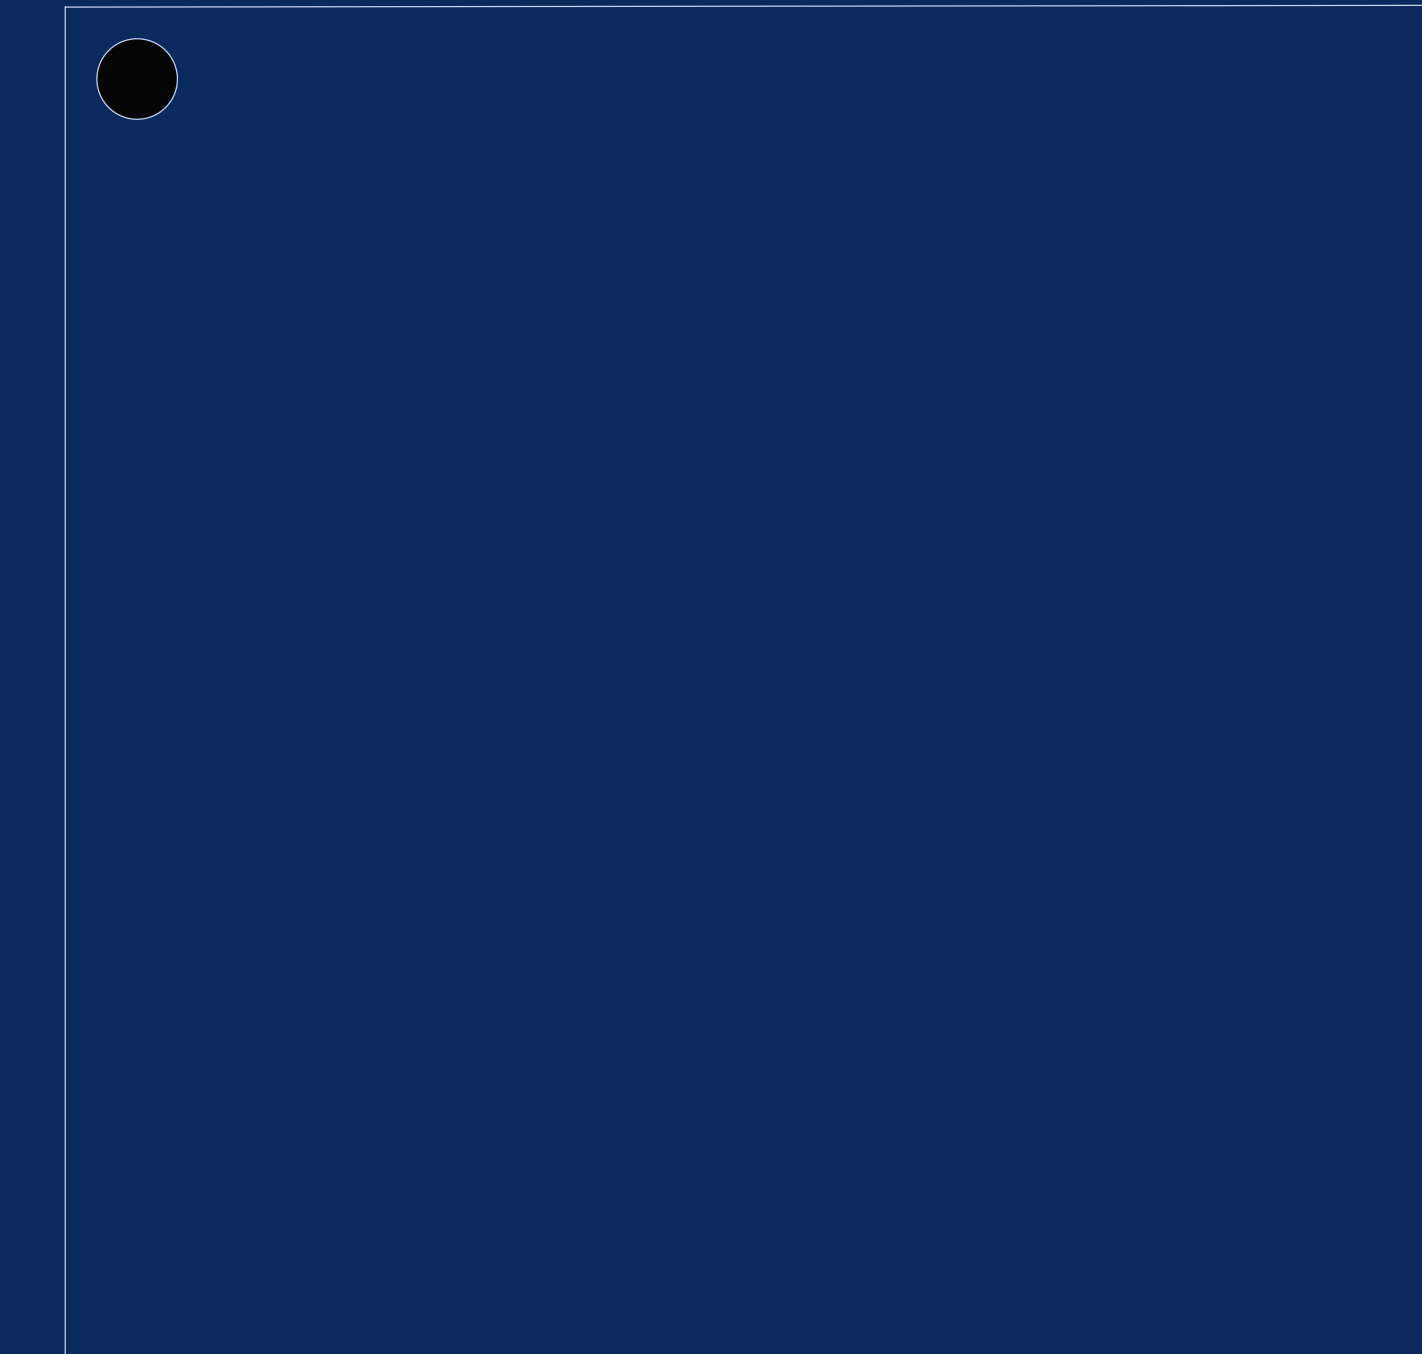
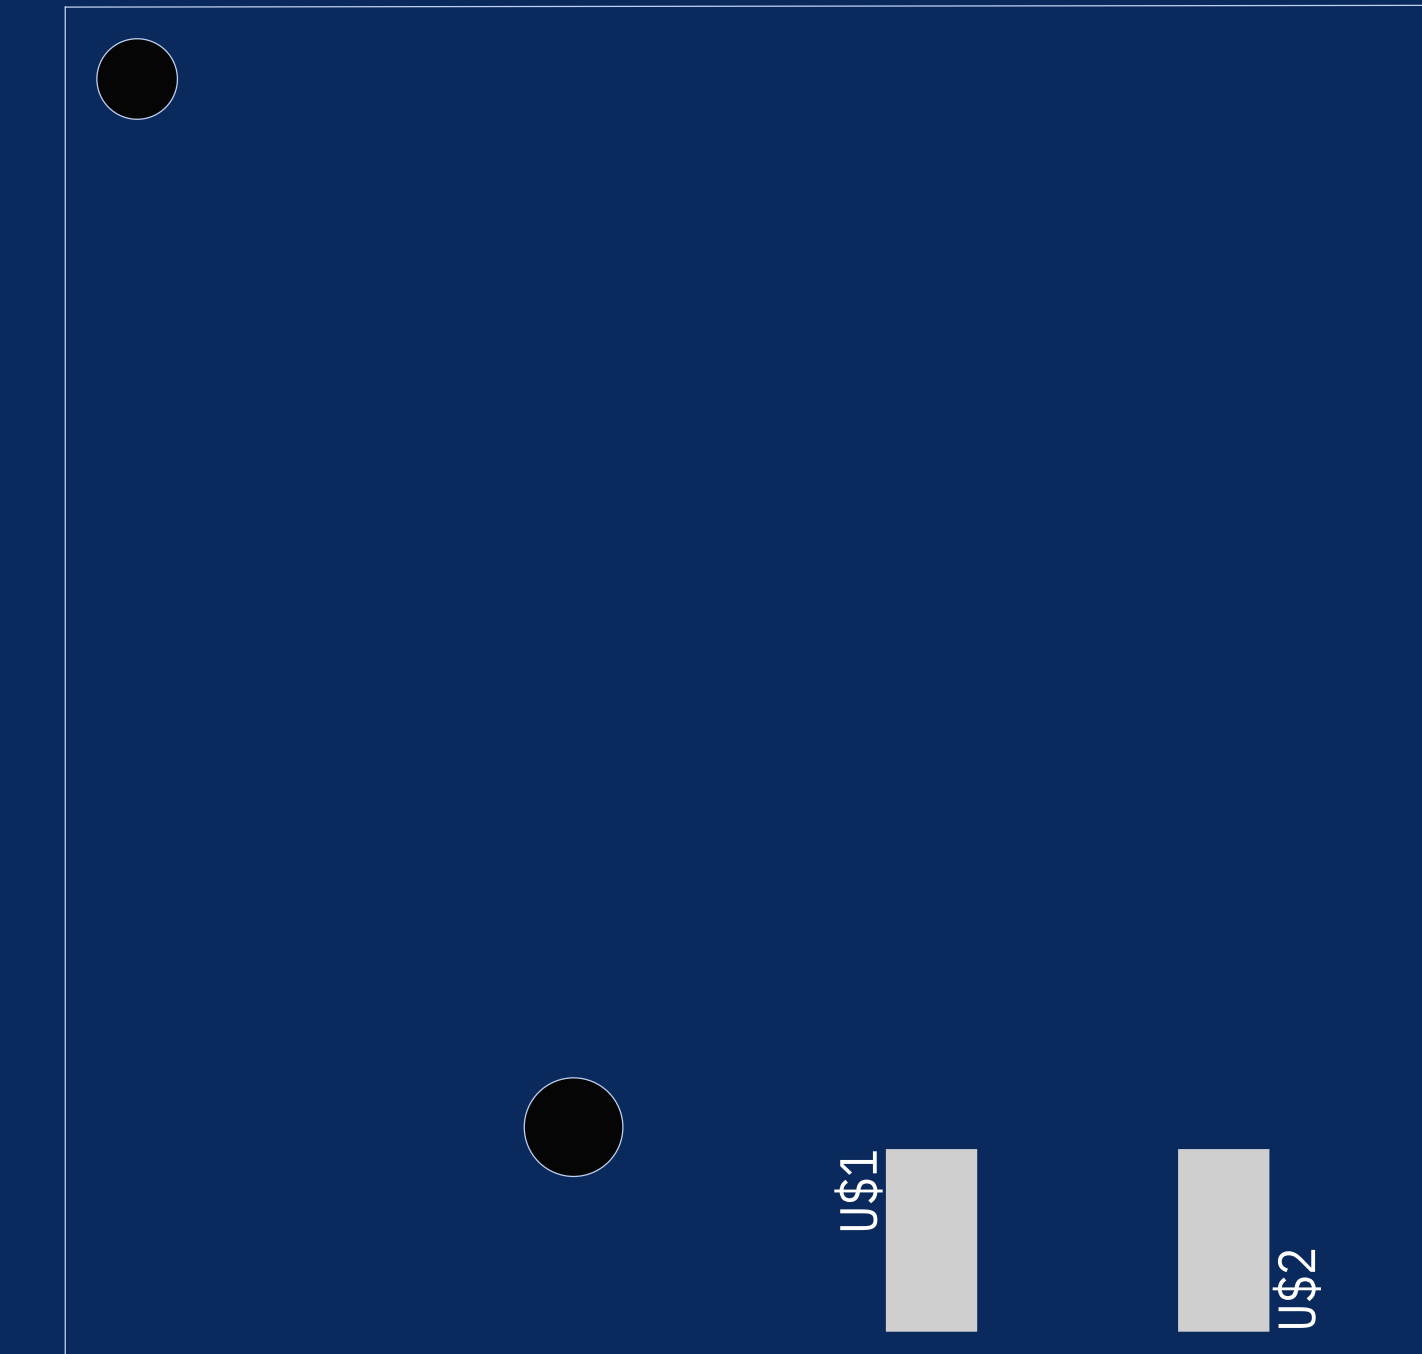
hole: none -> (573, 1127)
U$1: none -> (931, 1240)
U$2: none -> (1223, 1240)

